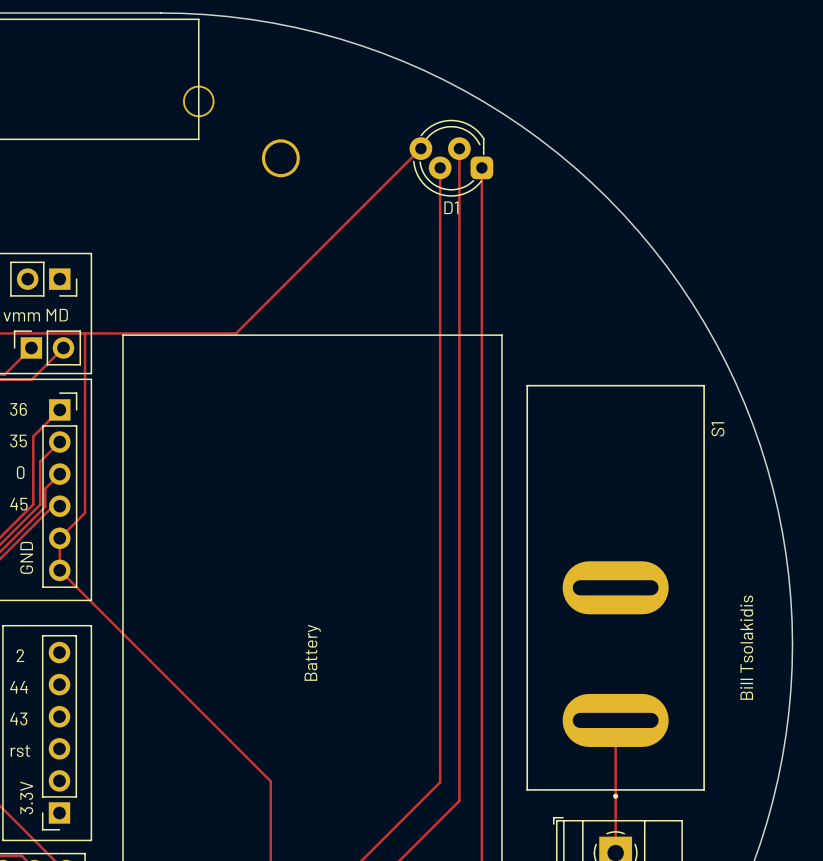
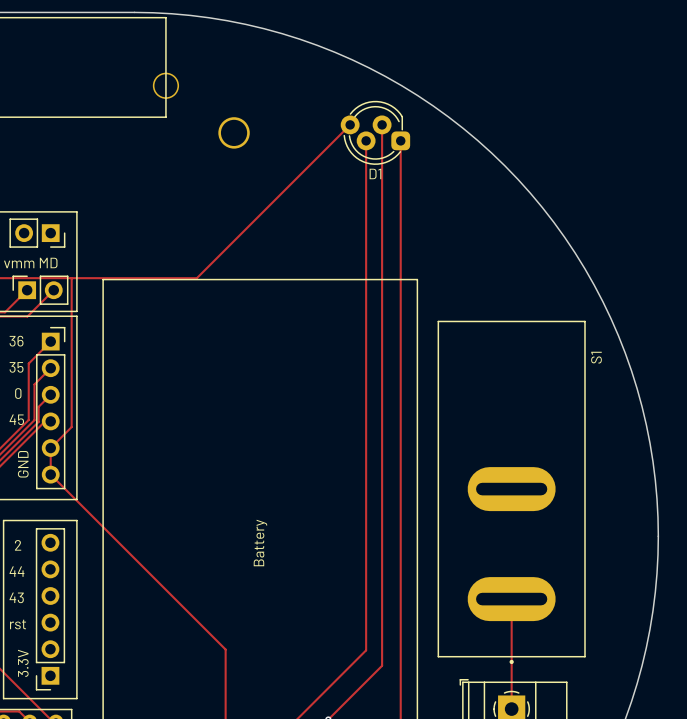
text: Bill Tsolakidis (746, 647) -> none

